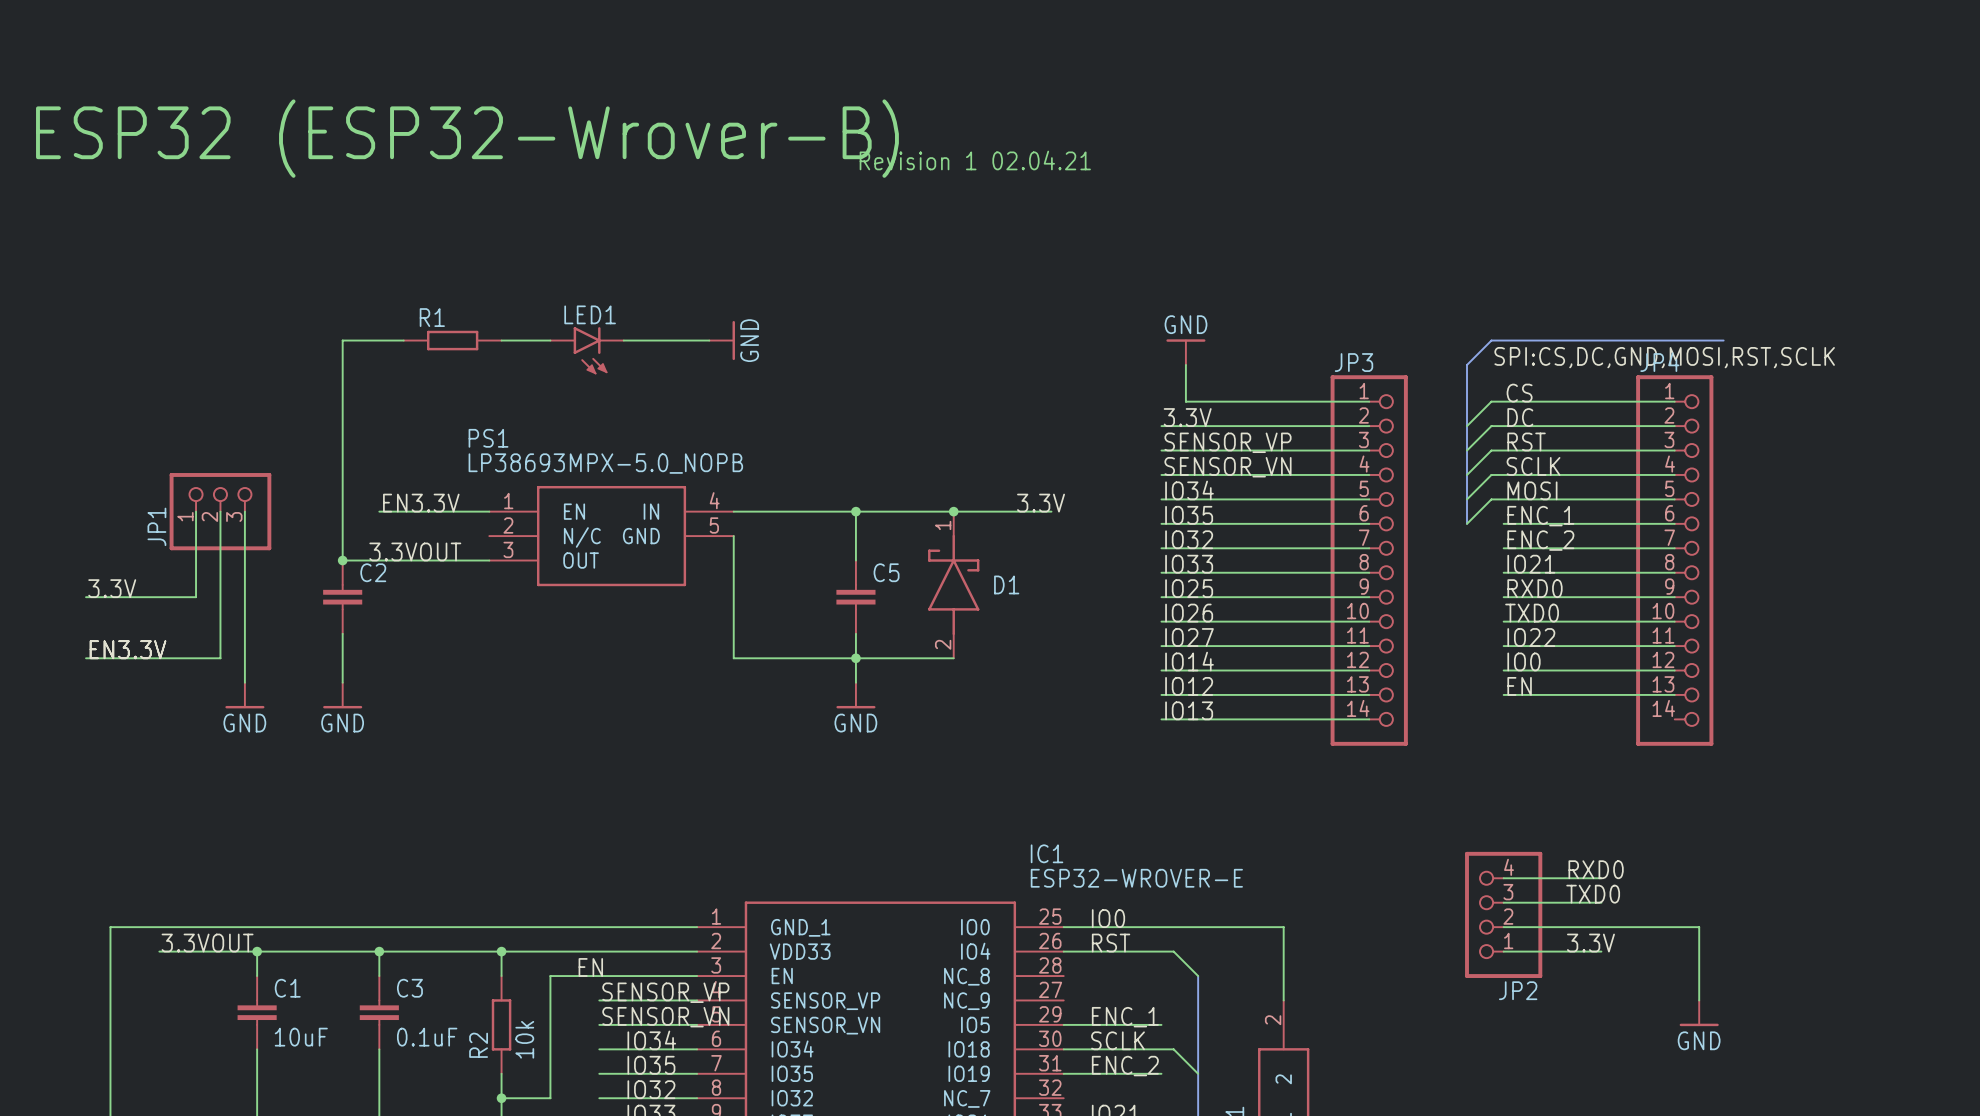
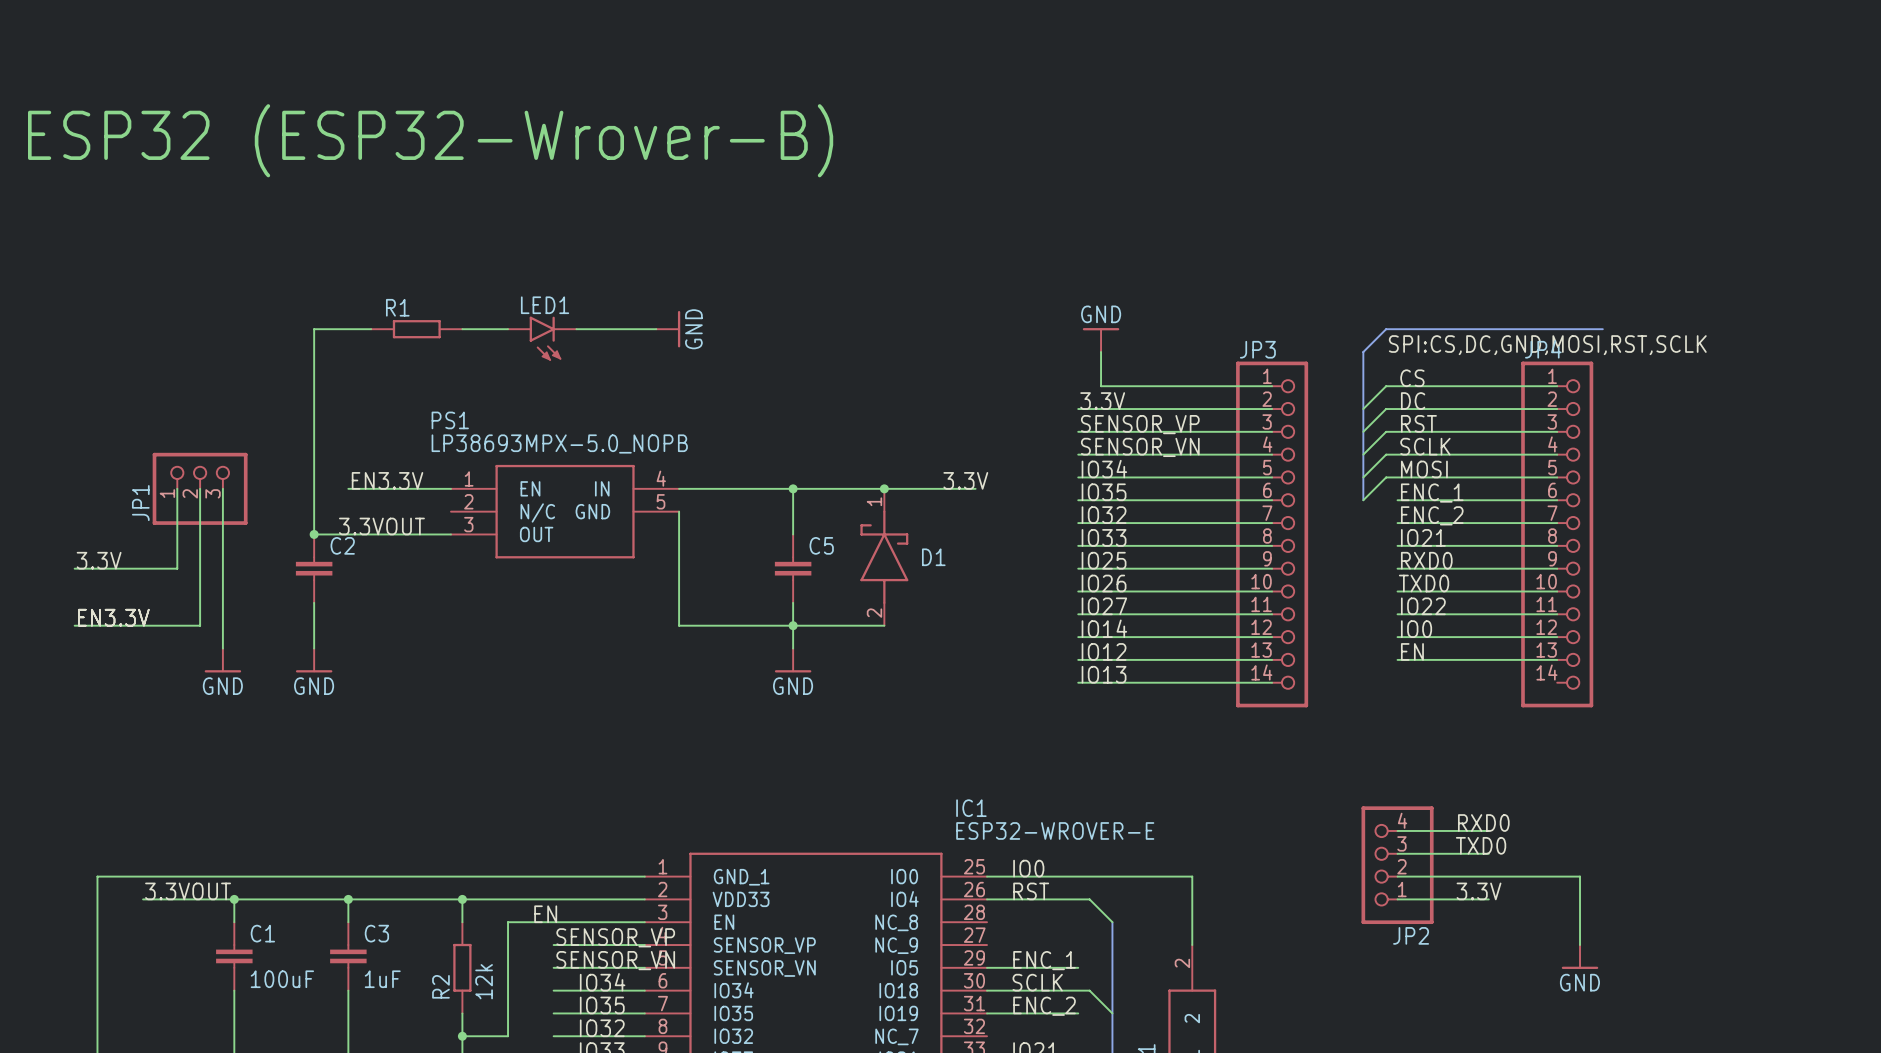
text: Revision 1 02.04.21 (975, 160) -> none
C1 value: 10uF (301, 1037) -> 100uF (282, 979)
C3 value: 0.1uF (427, 1037) -> 1uF (382, 979)
R2 value: 10k (524, 1039) -> 12k (484, 981)

